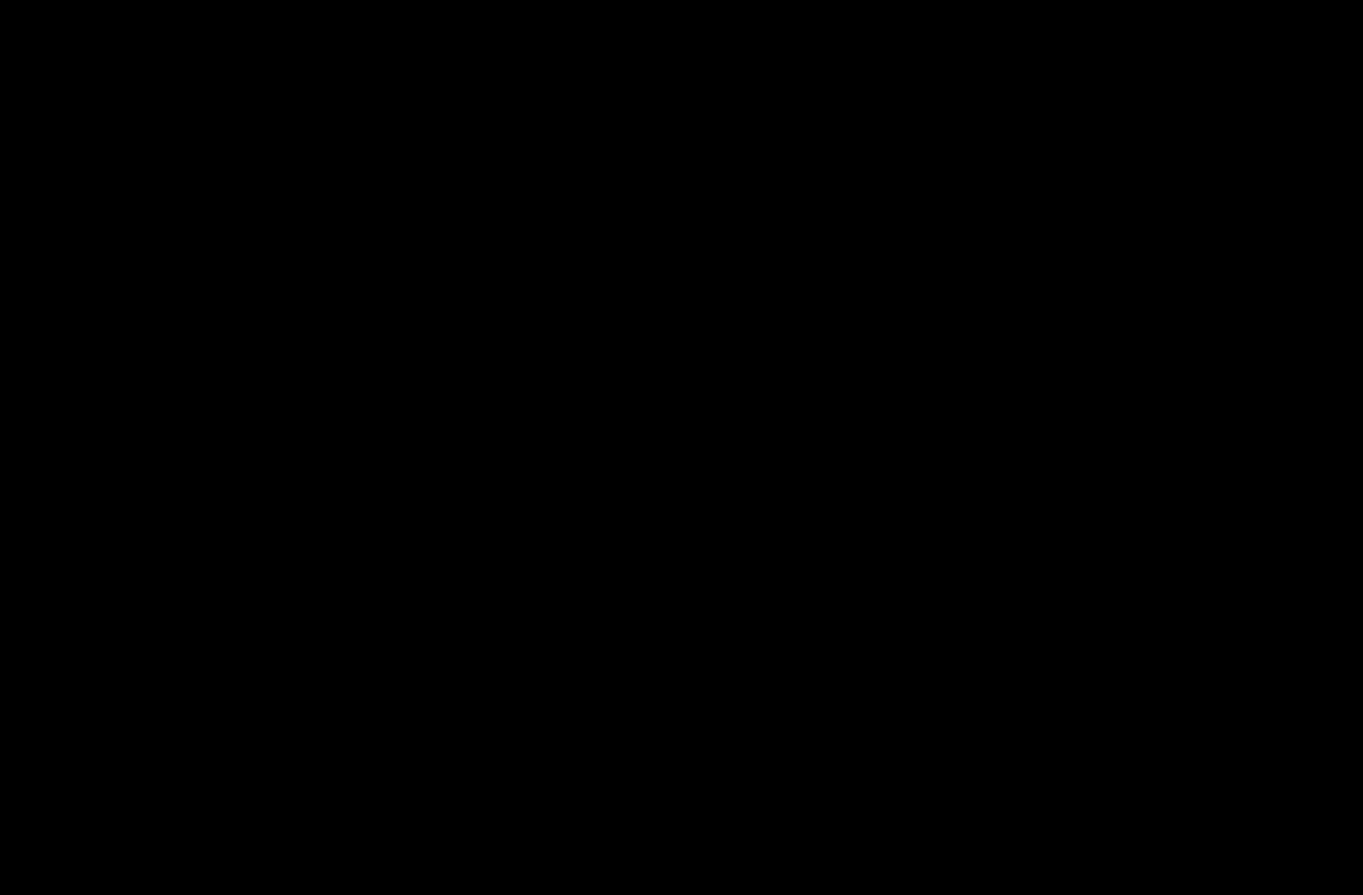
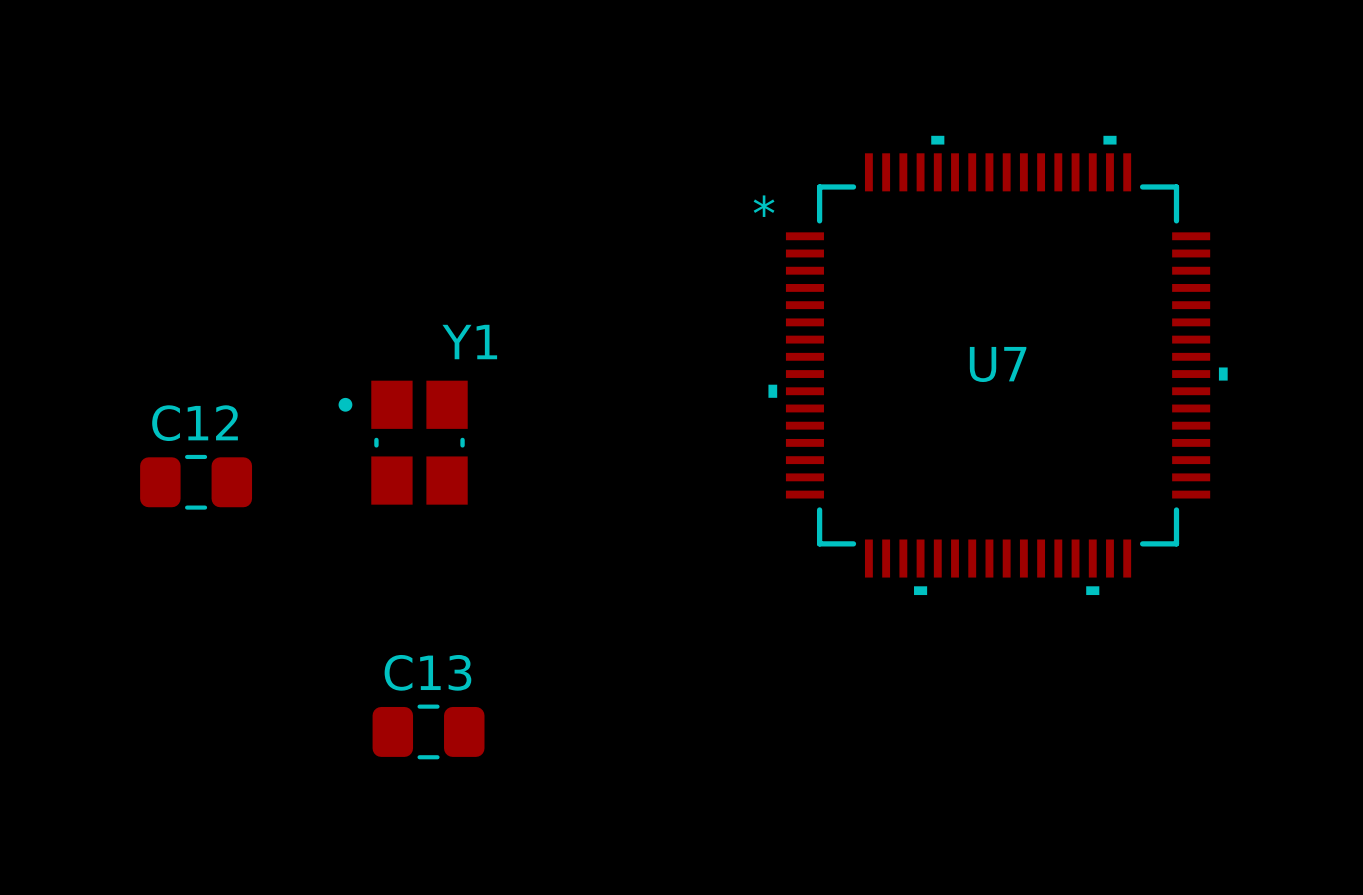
U7: none -> (998, 365)
Y1: none -> (403, 442)
C12: none -> (196, 482)
C13: none -> (428, 731)

